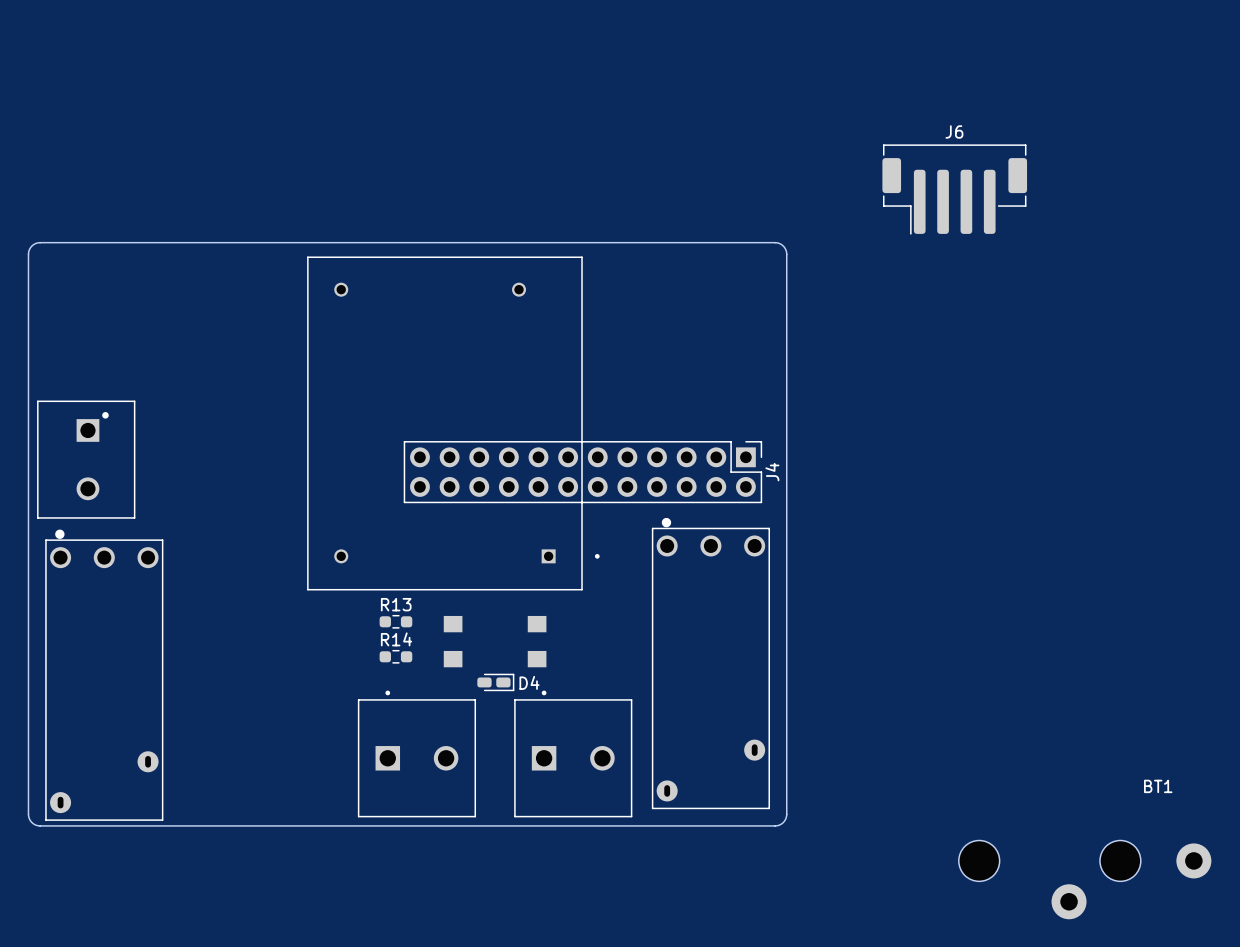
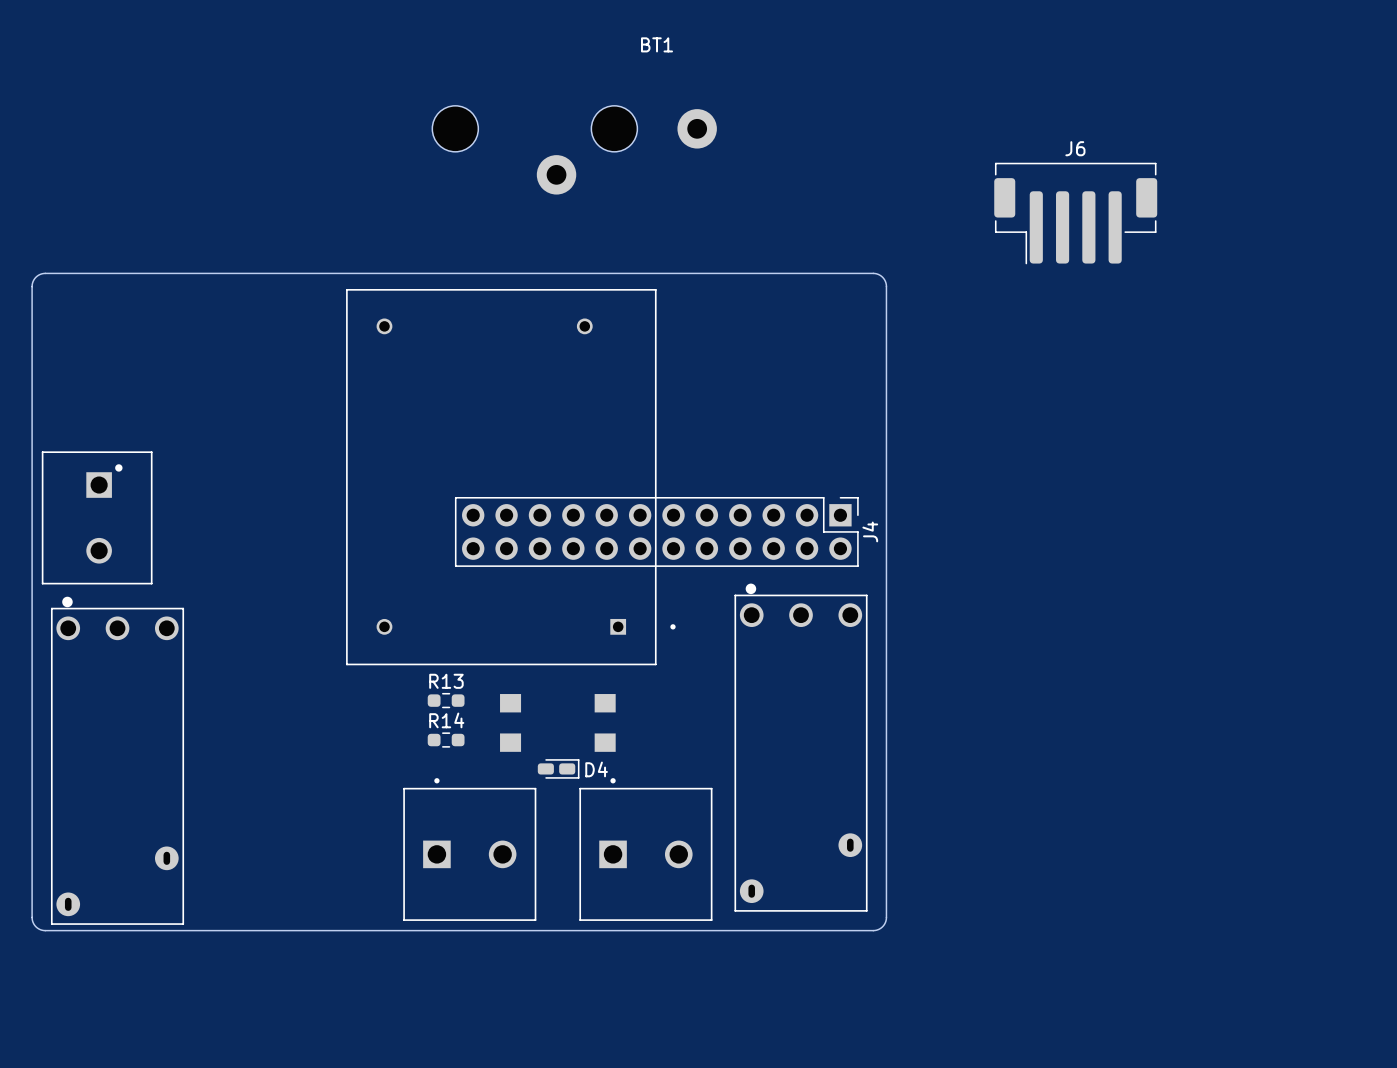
BT1 position: (1085, 879) -> (574, 150)

